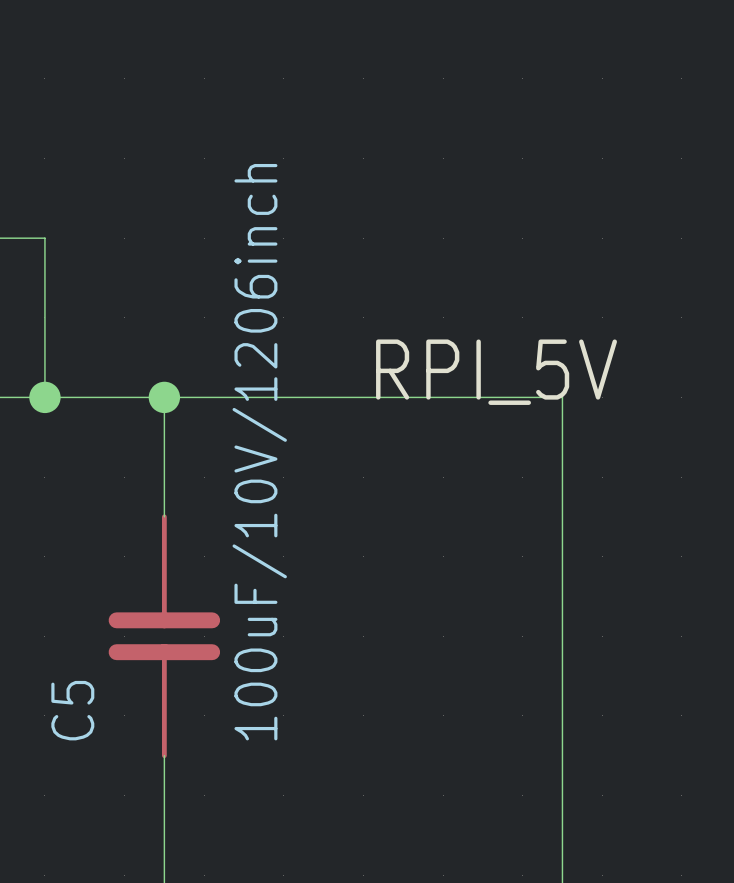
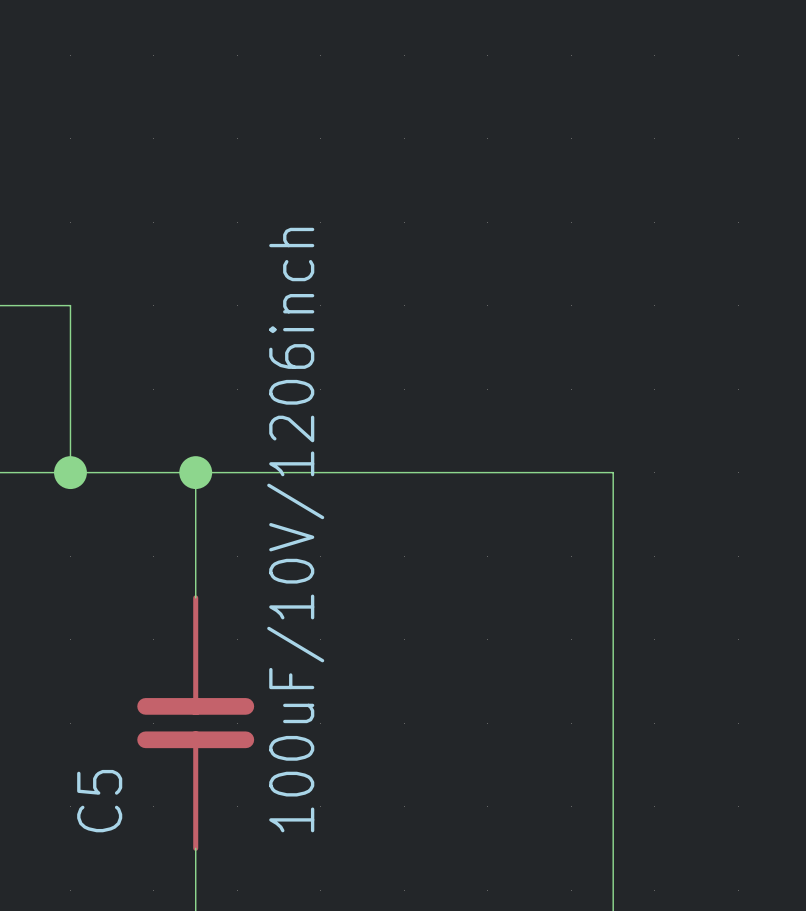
label: RPI_5V (496, 372) -> none

